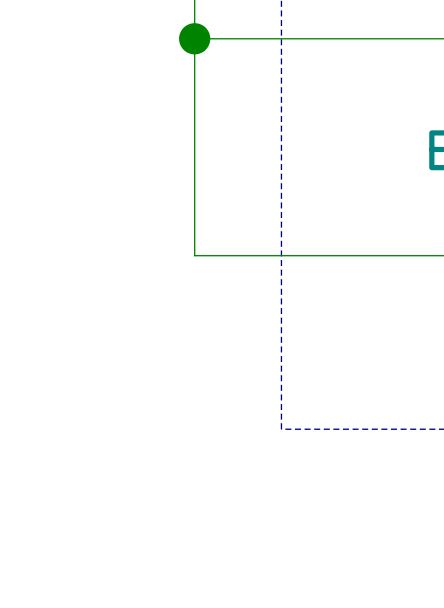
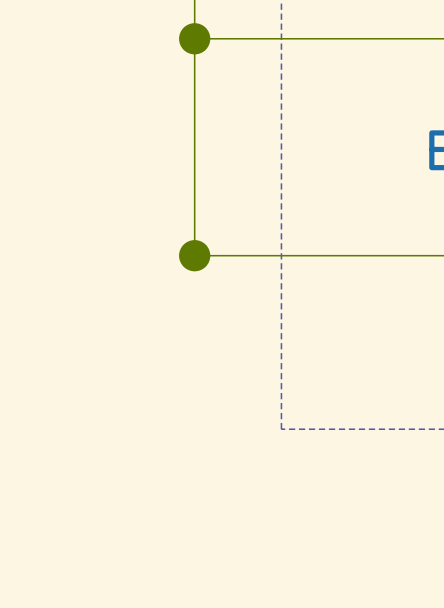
junction: none -> (194, 255)

